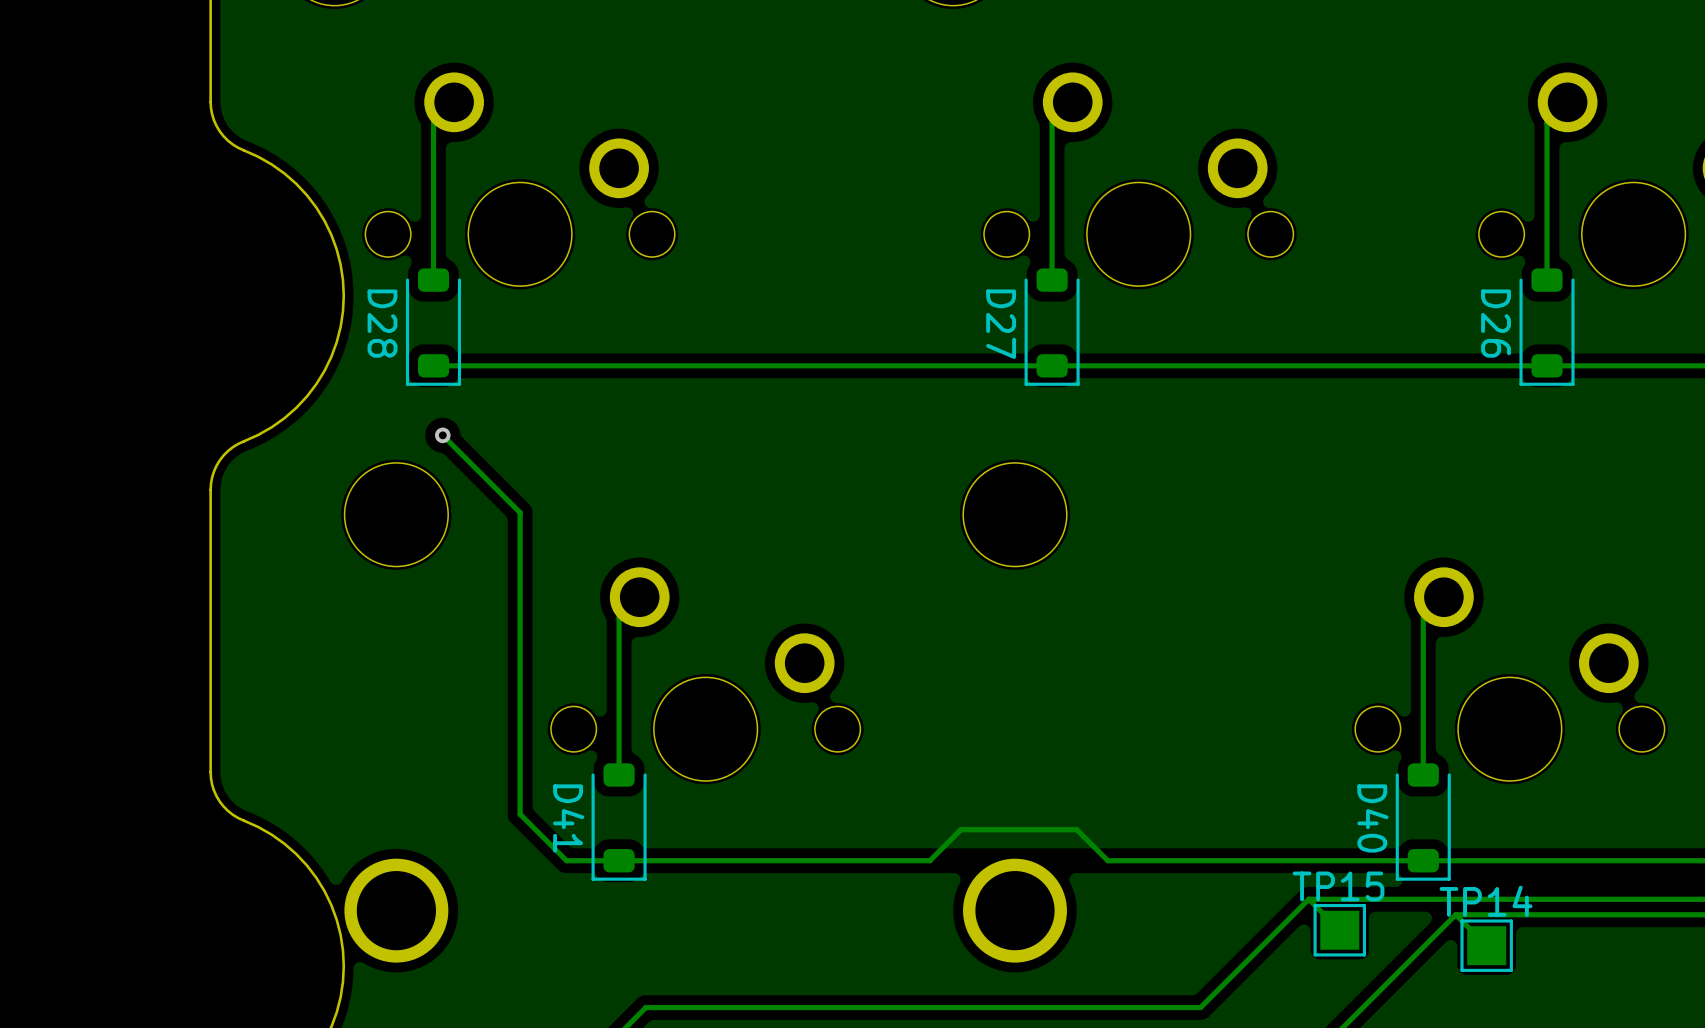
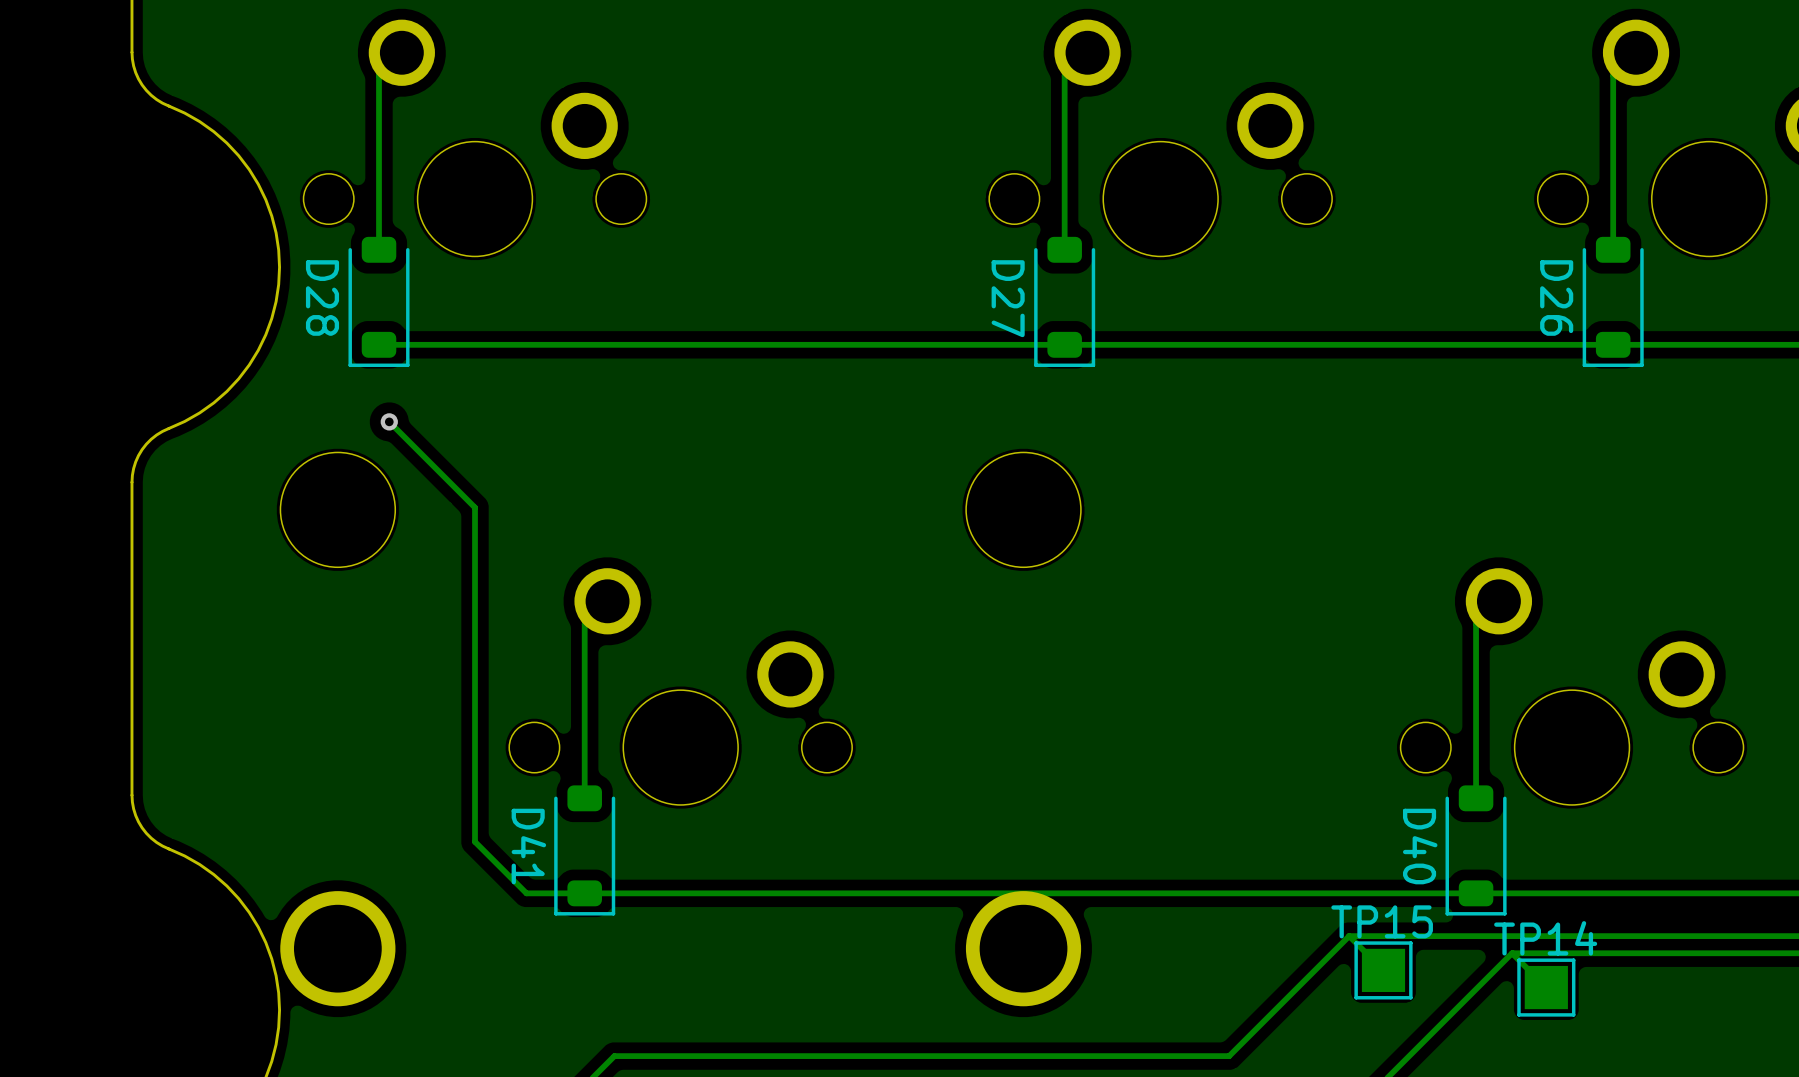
track: (1107, 860) (1076, 829) (960, 829) (929, 860) -> (1126, 893) (929, 893)

